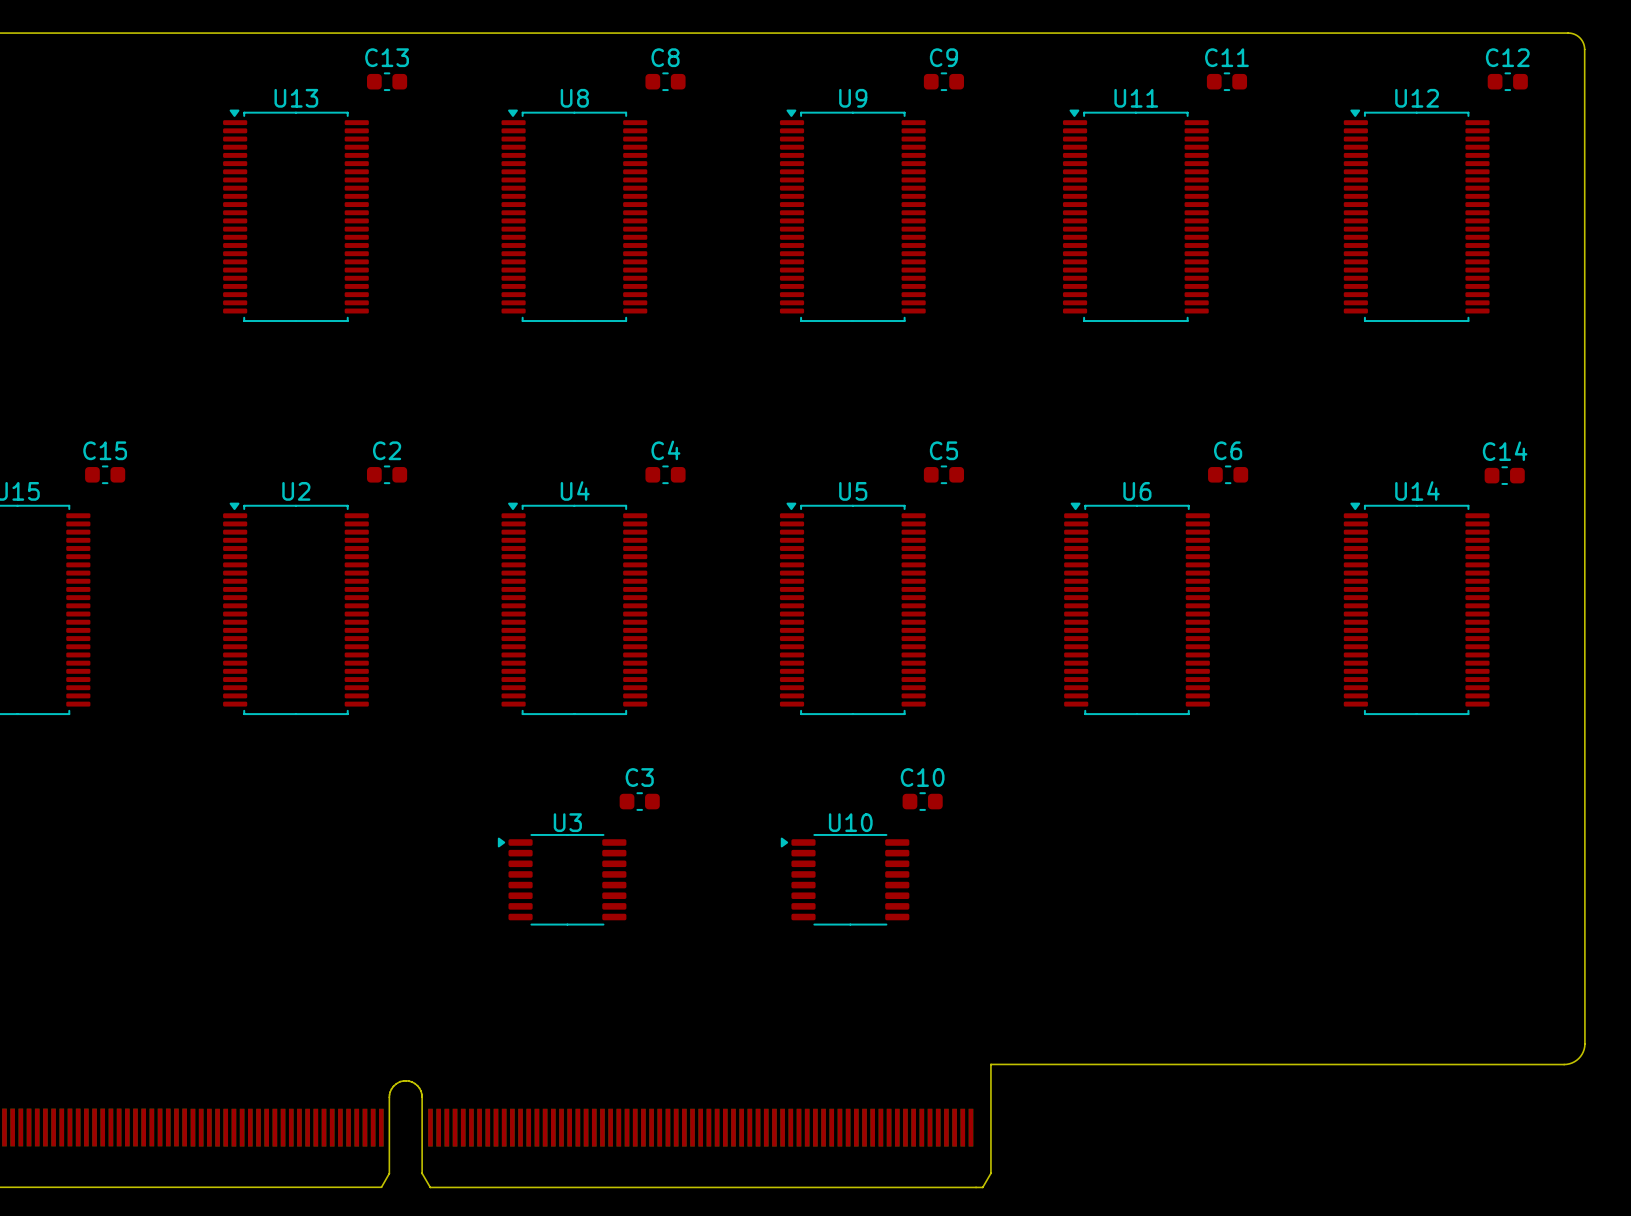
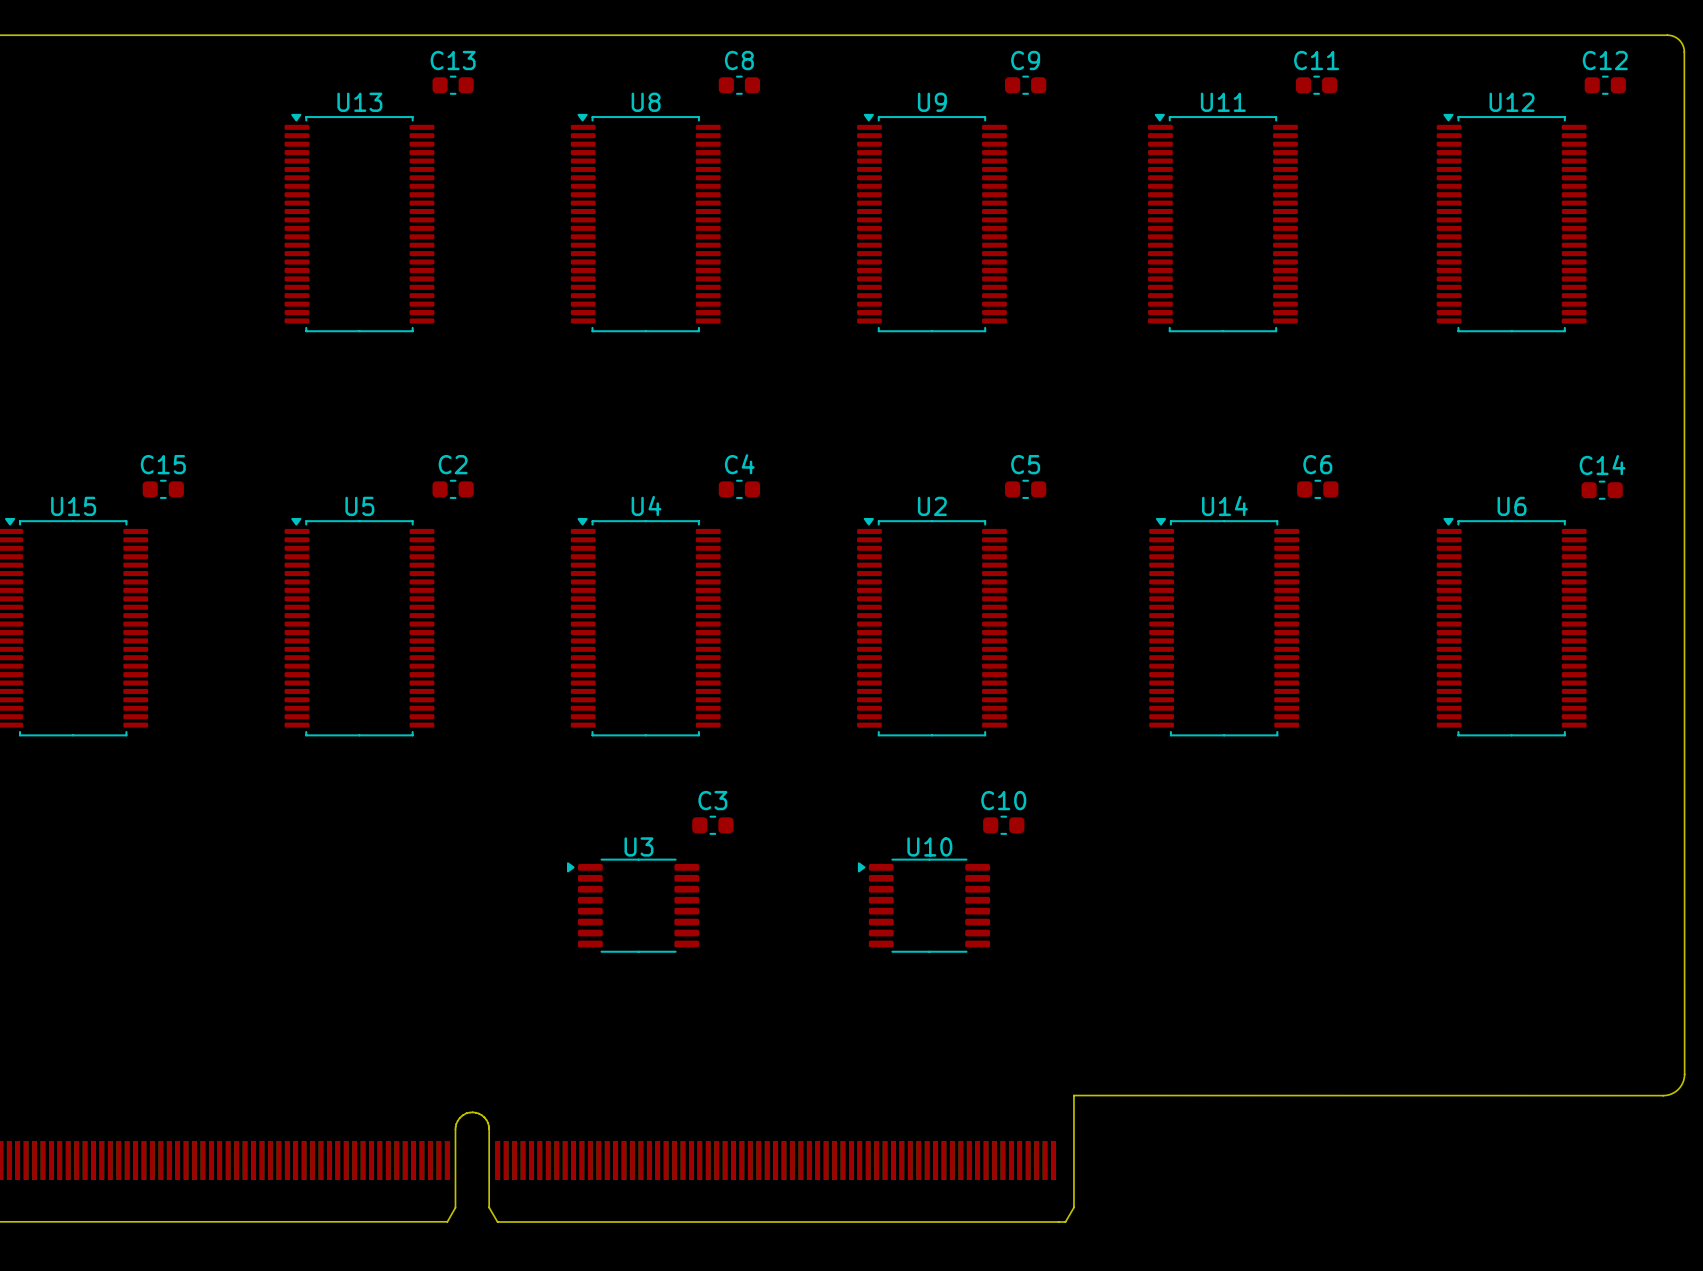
U14 name: U14 (1417, 490) -> U6 (1512, 506)
U2 name: U2 (296, 491) -> U5 (359, 506)
U5 name: U5 (853, 491) -> U2 (932, 506)
U6 name: U6 (1137, 491) -> U14 (1224, 506)

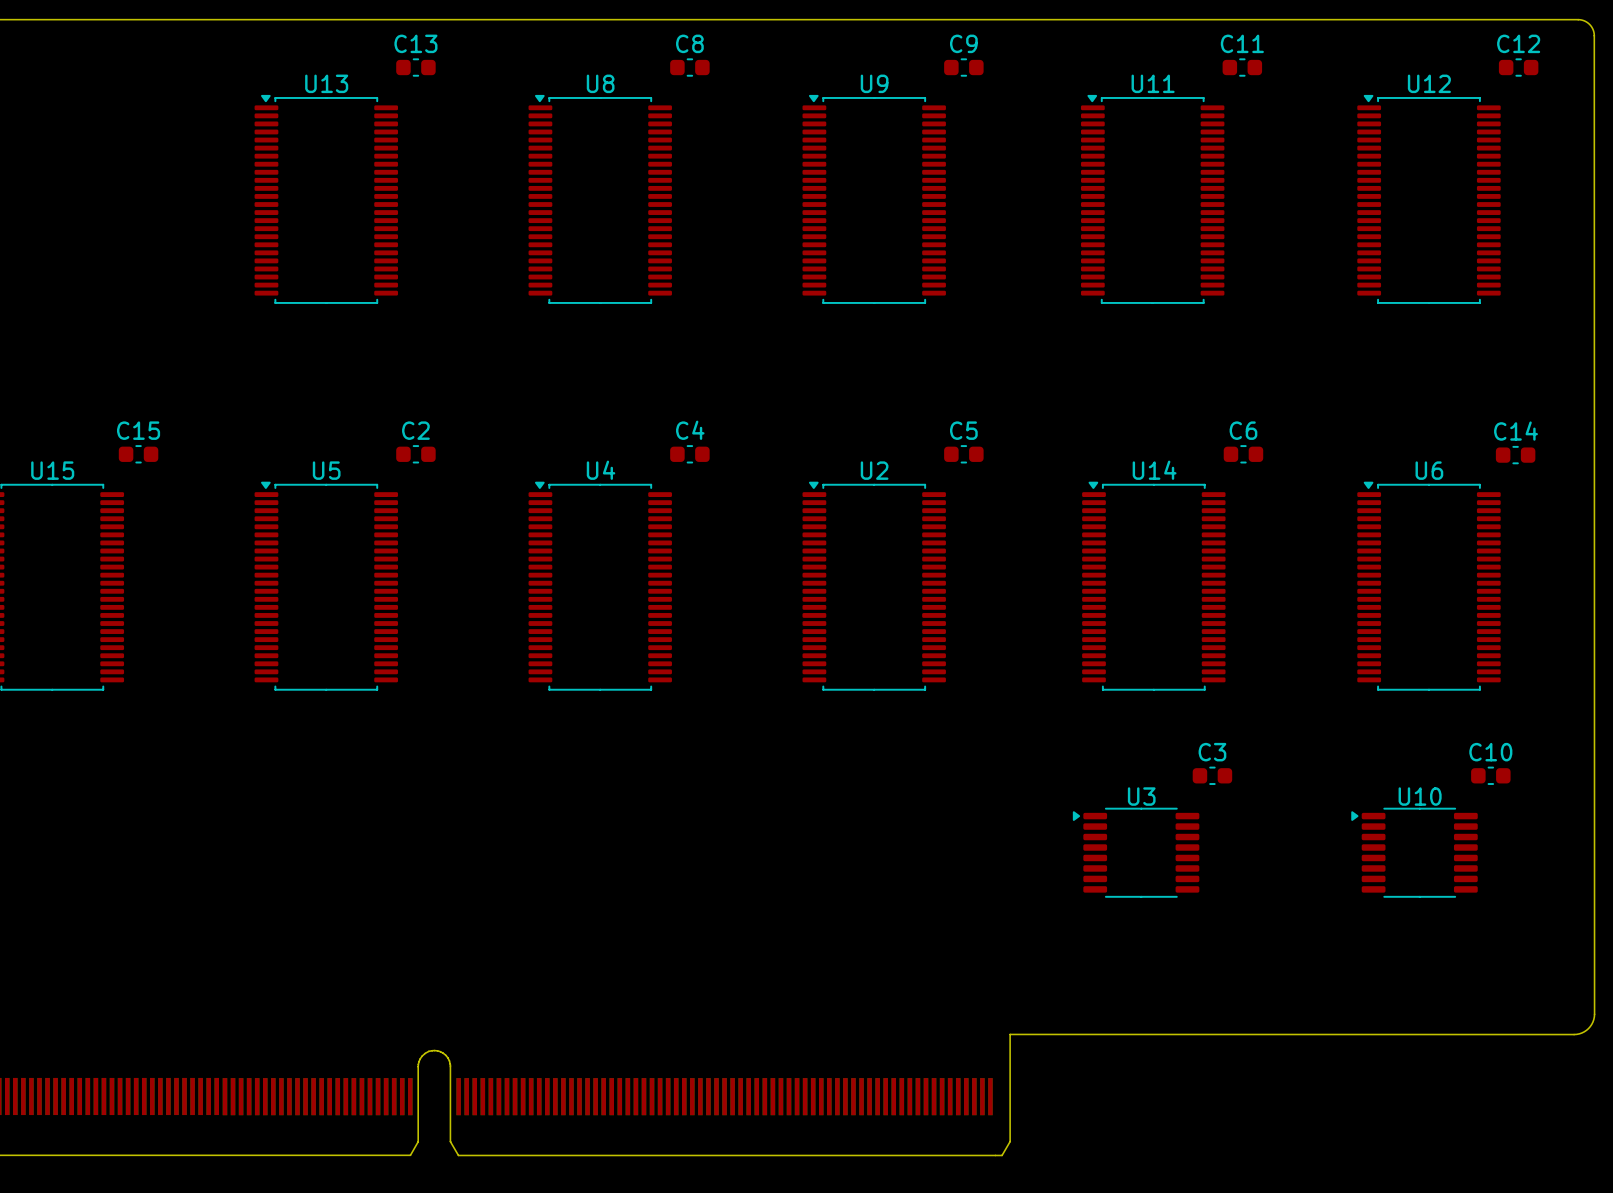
C3 position: (712, 825) -> (1212, 775)
C10 position: (1003, 825) -> (1490, 775)
U3 position: (633, 905) -> (1136, 852)
U10 position: (923, 905) -> (1414, 852)

